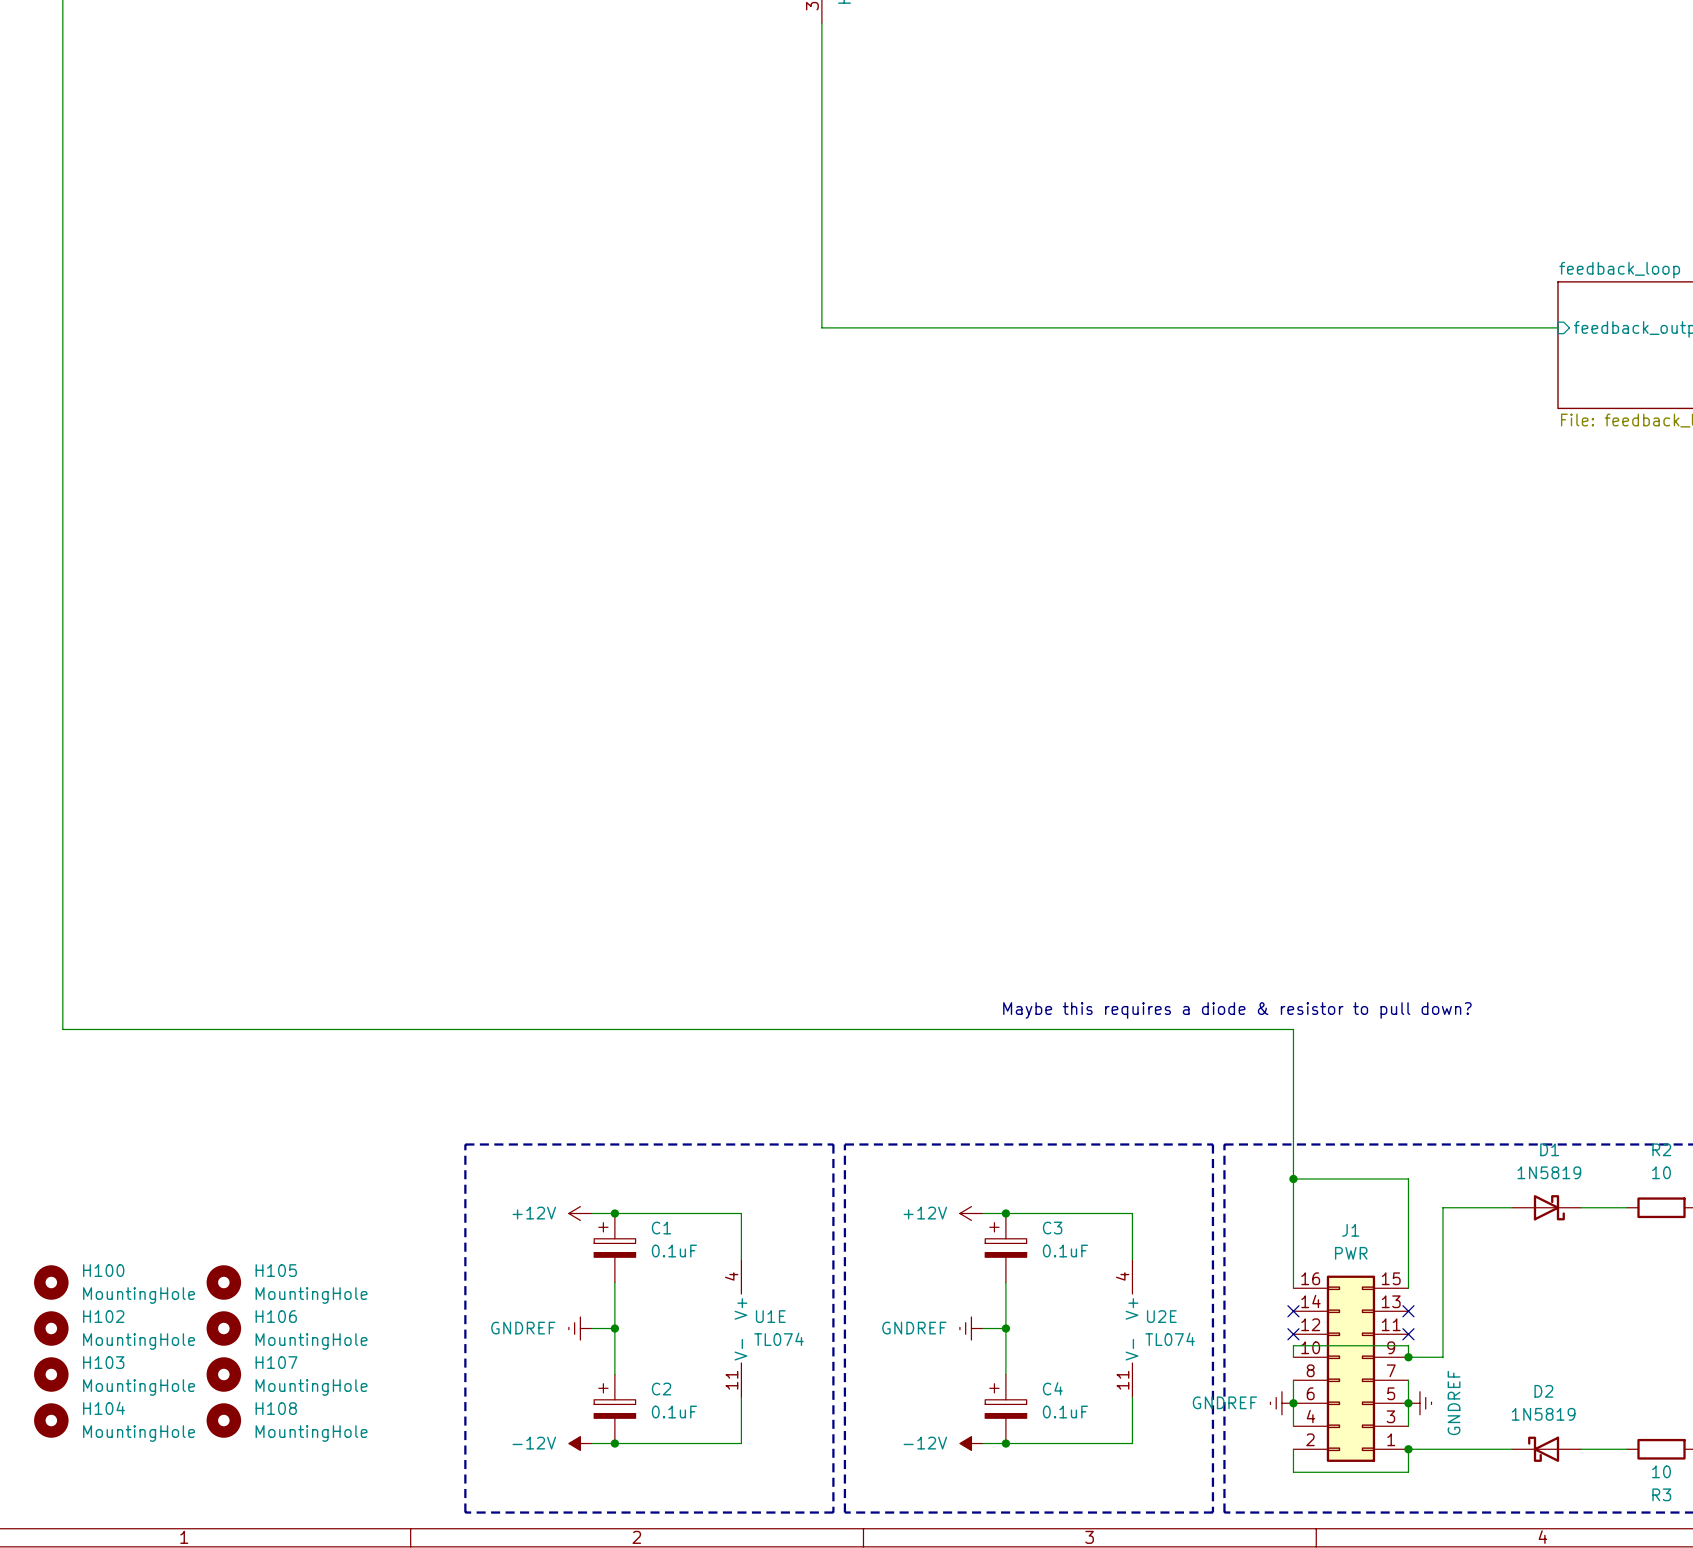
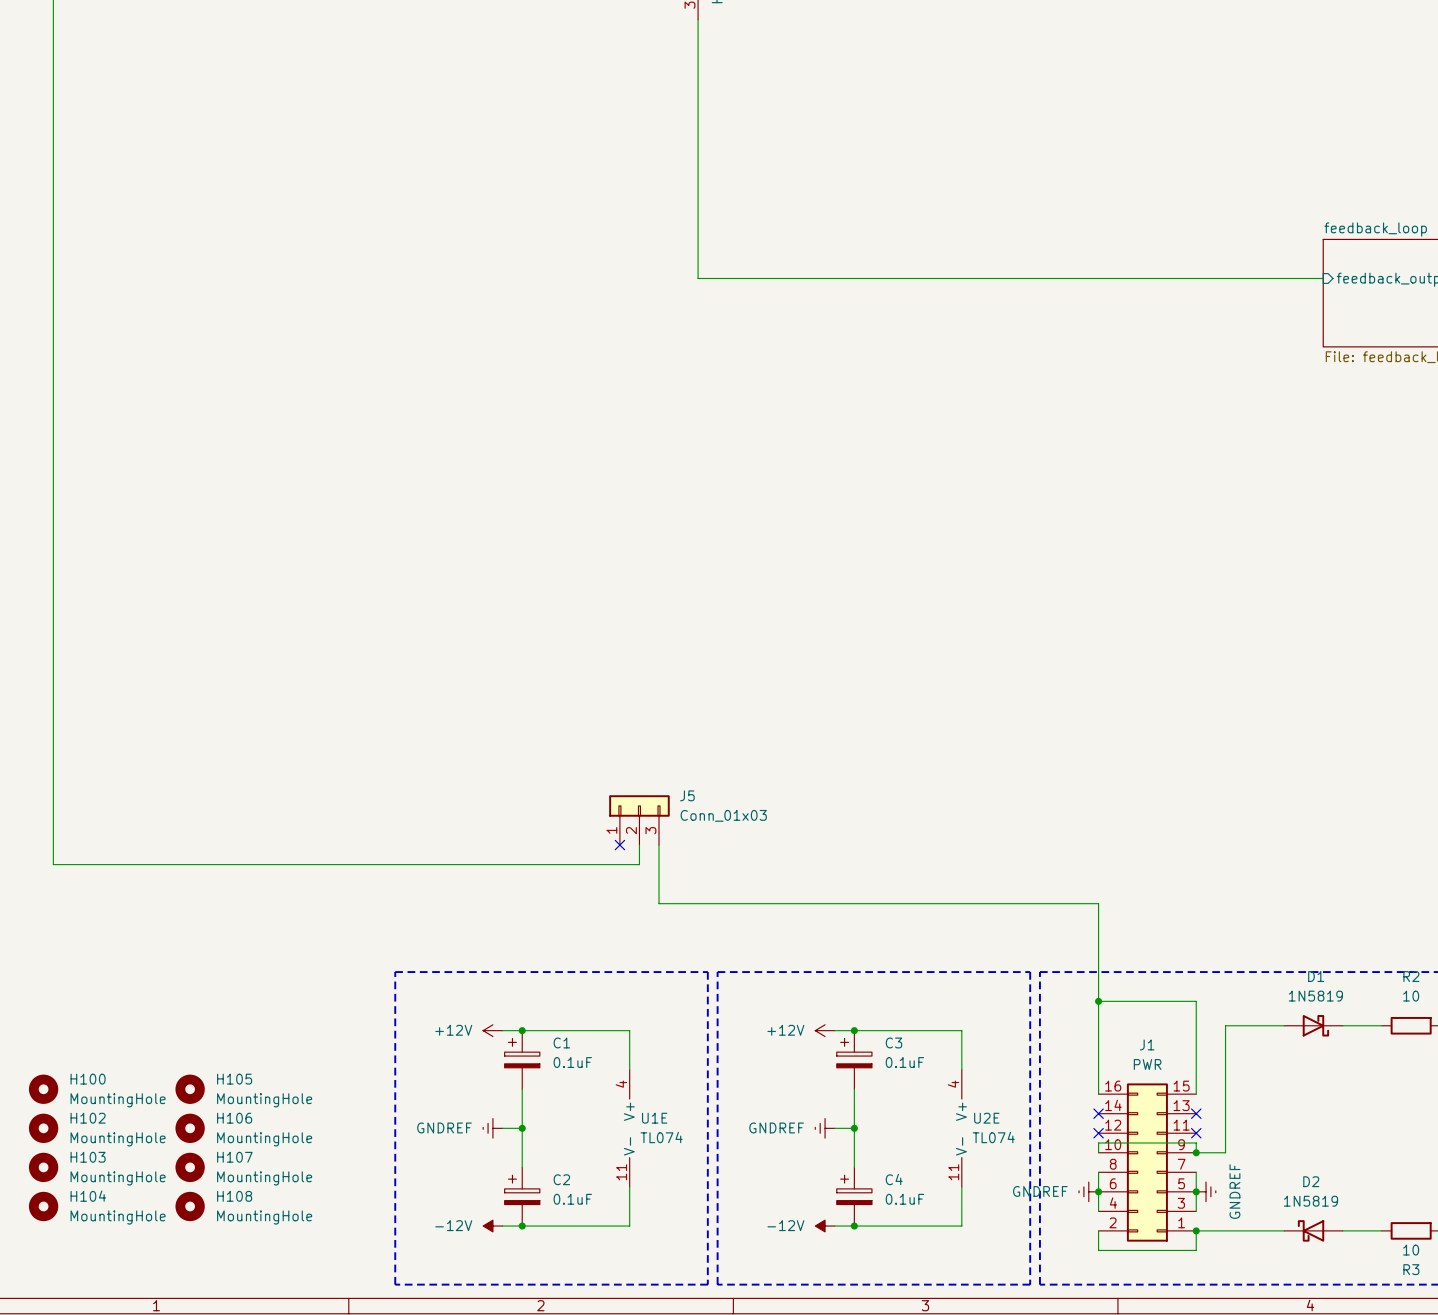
J5: none -> Conn_01x03 (639, 820)
no-connect mark: none -> (619, 845)
wire: none -> (658, 845) (658, 903) (1098, 903)
text: Maybe this requires a diode & resistor to pull down? (1237, 1010) -> none
wire: (62, 1017) (62, 1029) (1293, 1029) (1293, 1063) -> (53, 864) (639, 864) (639, 845)

